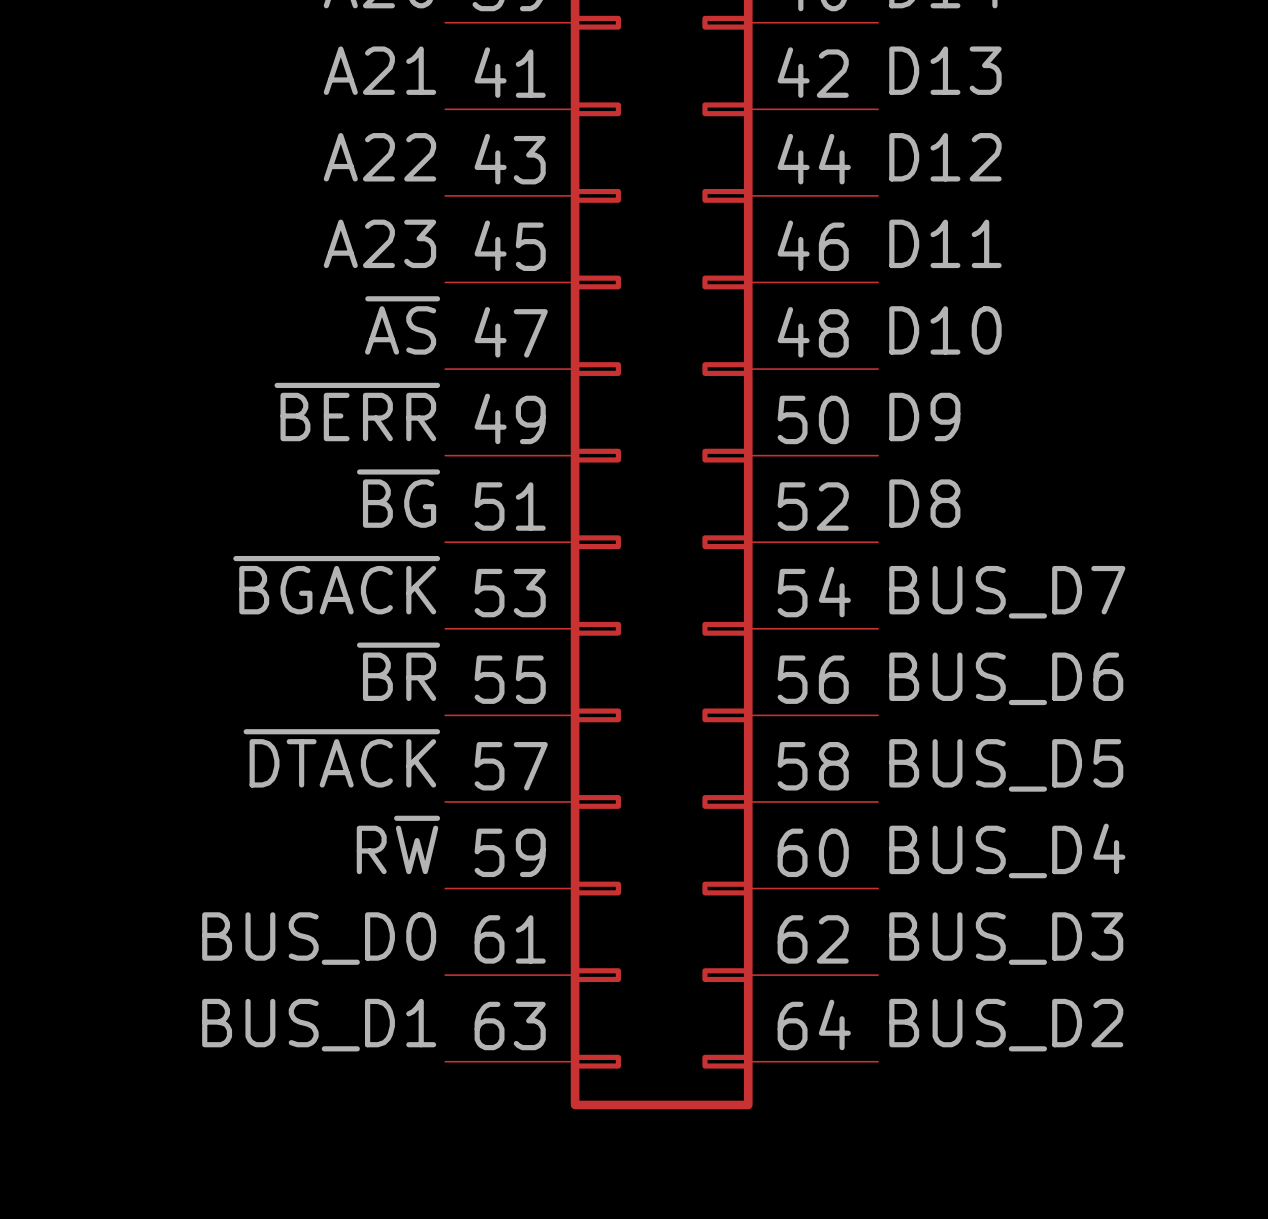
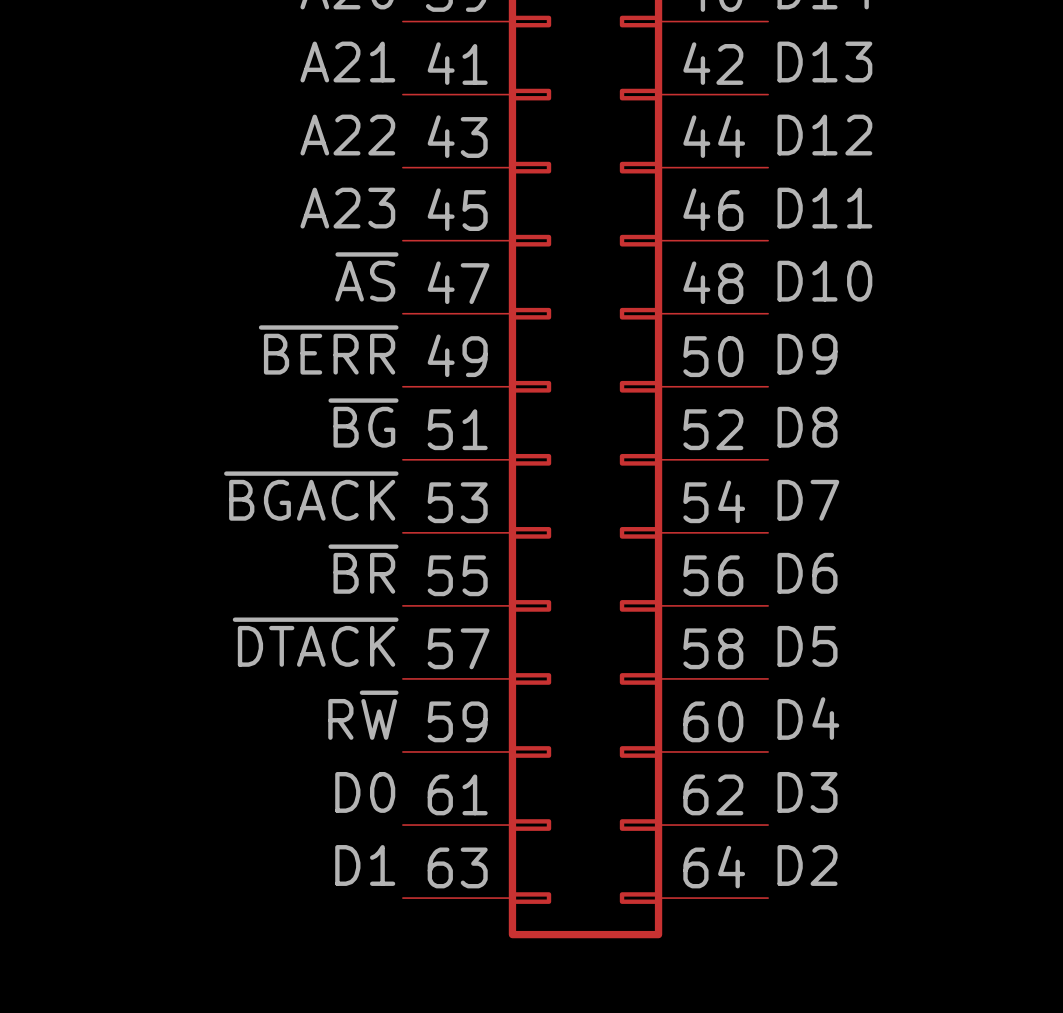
label: BUS_D7 (1007, 592) -> D7 (808, 500)
label: BUS_D6 (1006, 678) -> D6 (807, 573)
label: BUS_D5 (1006, 765) -> D5 (807, 646)
label: BUS_D4 (1007, 850) -> D4 (808, 718)
label: BUS_D0 (319, 938) -> D0 (365, 792)
label: BUS_D3 (1006, 938) -> D3 (807, 792)
label: BUS_D1 (319, 1025) -> D1 (365, 865)
label: BUS_D2 (1006, 1025) -> D2 (807, 865)

